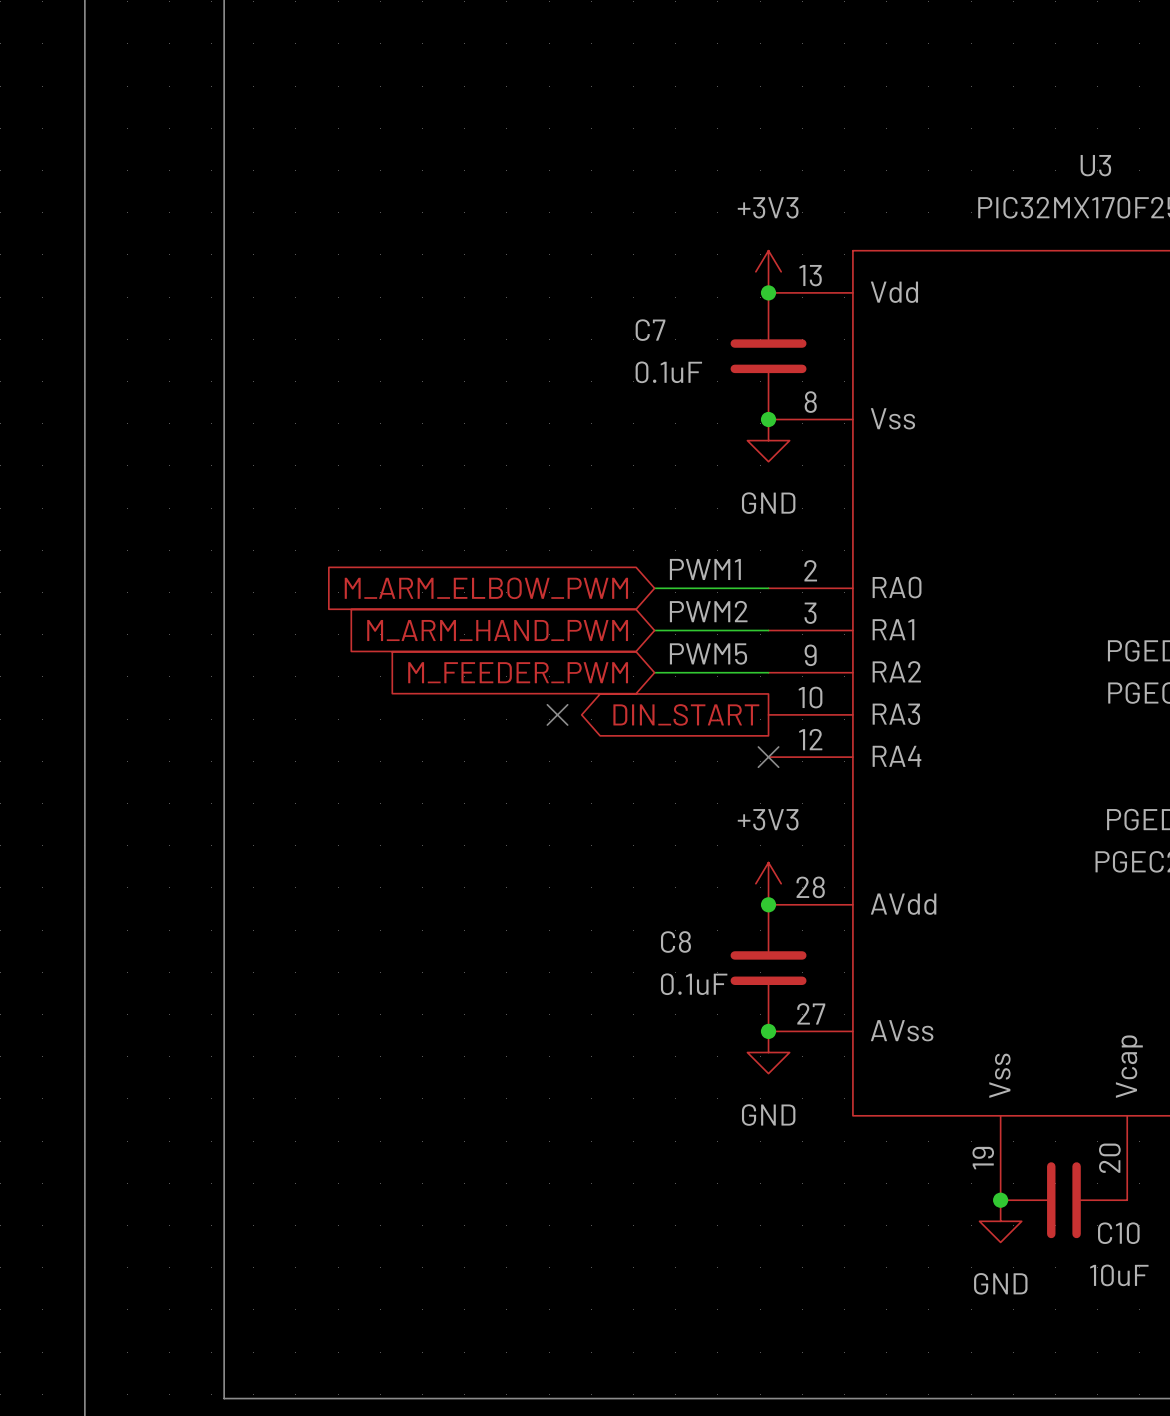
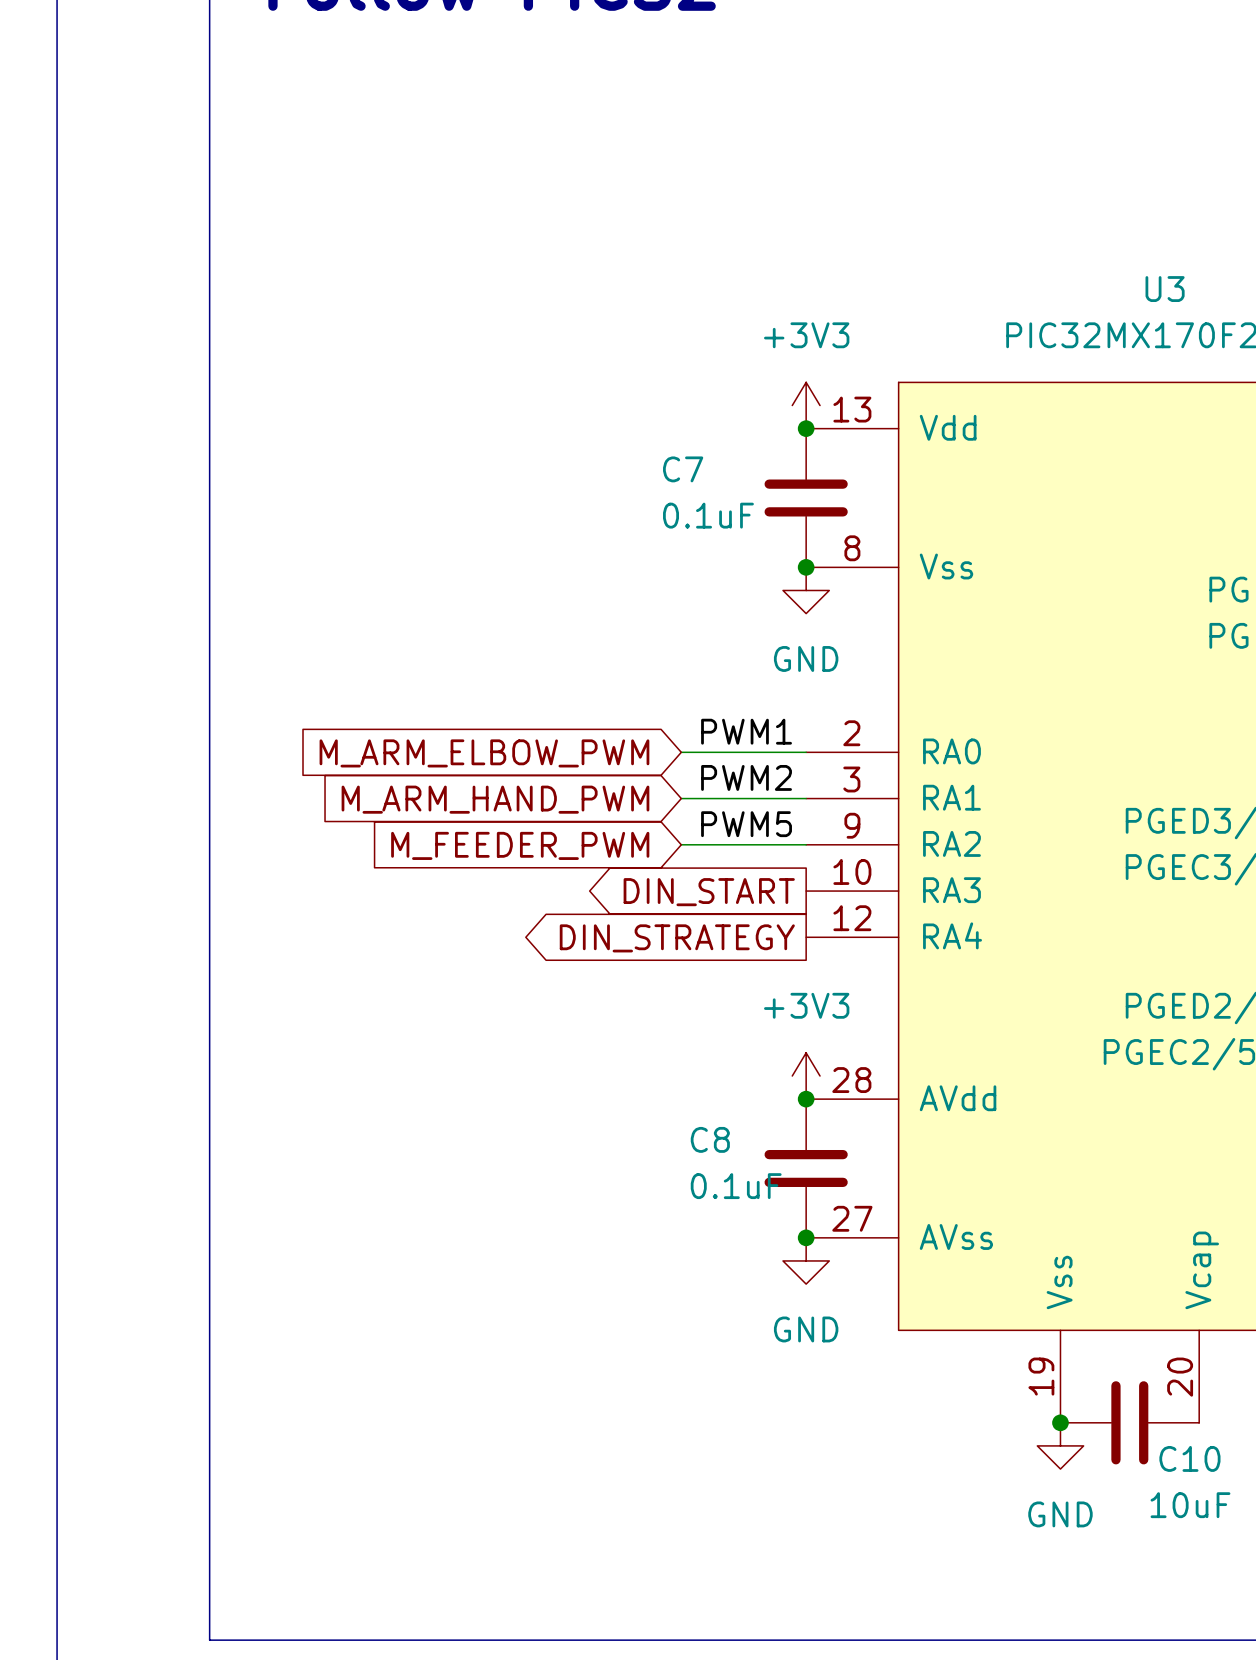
no-connect mark: (557, 714) -> none
global label: none -> DIN_STRATEGY (677, 938)
no-connect mark: (768, 757) -> none

